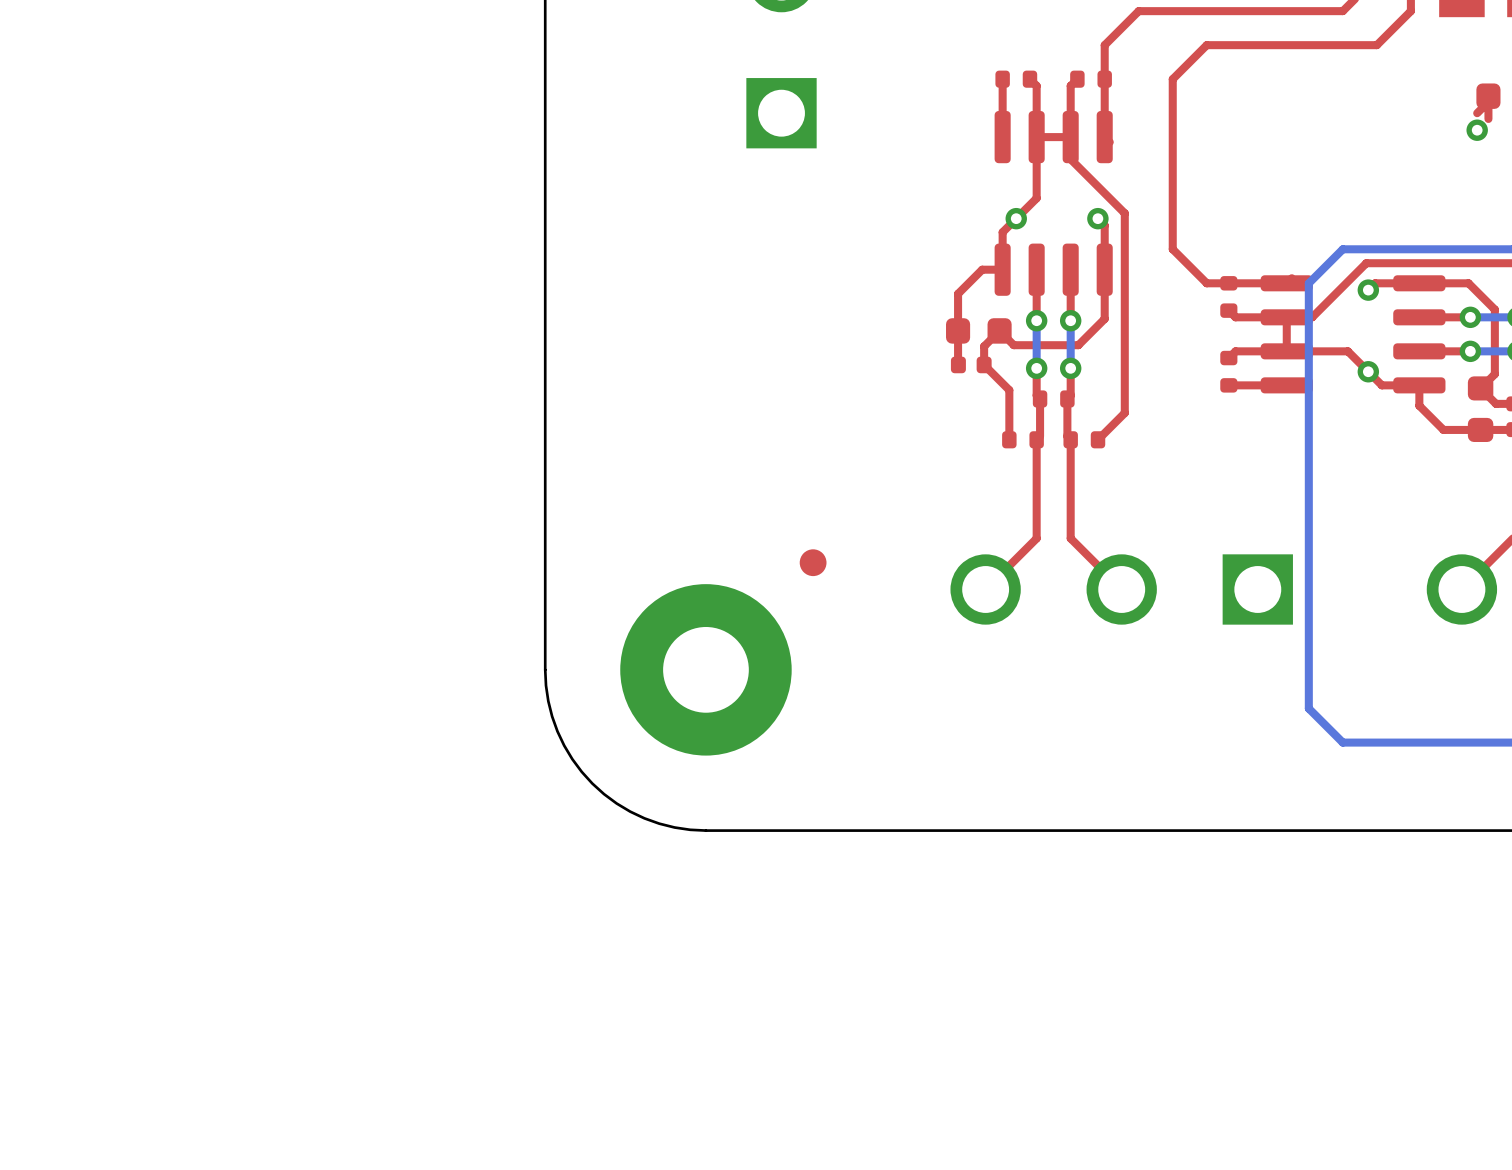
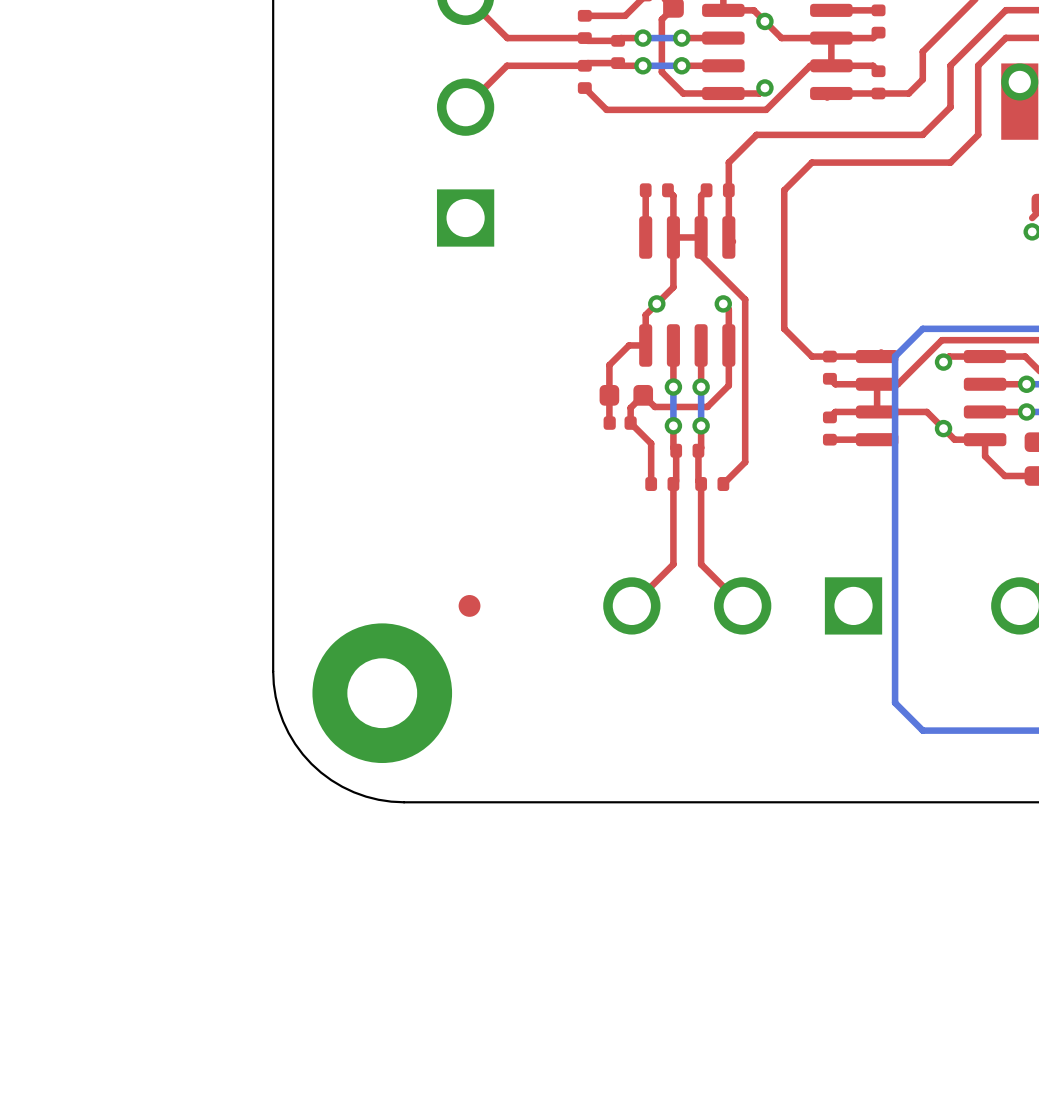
part position: (813, 562) -> (469, 605)
part position: (705, 669) -> (382, 693)

